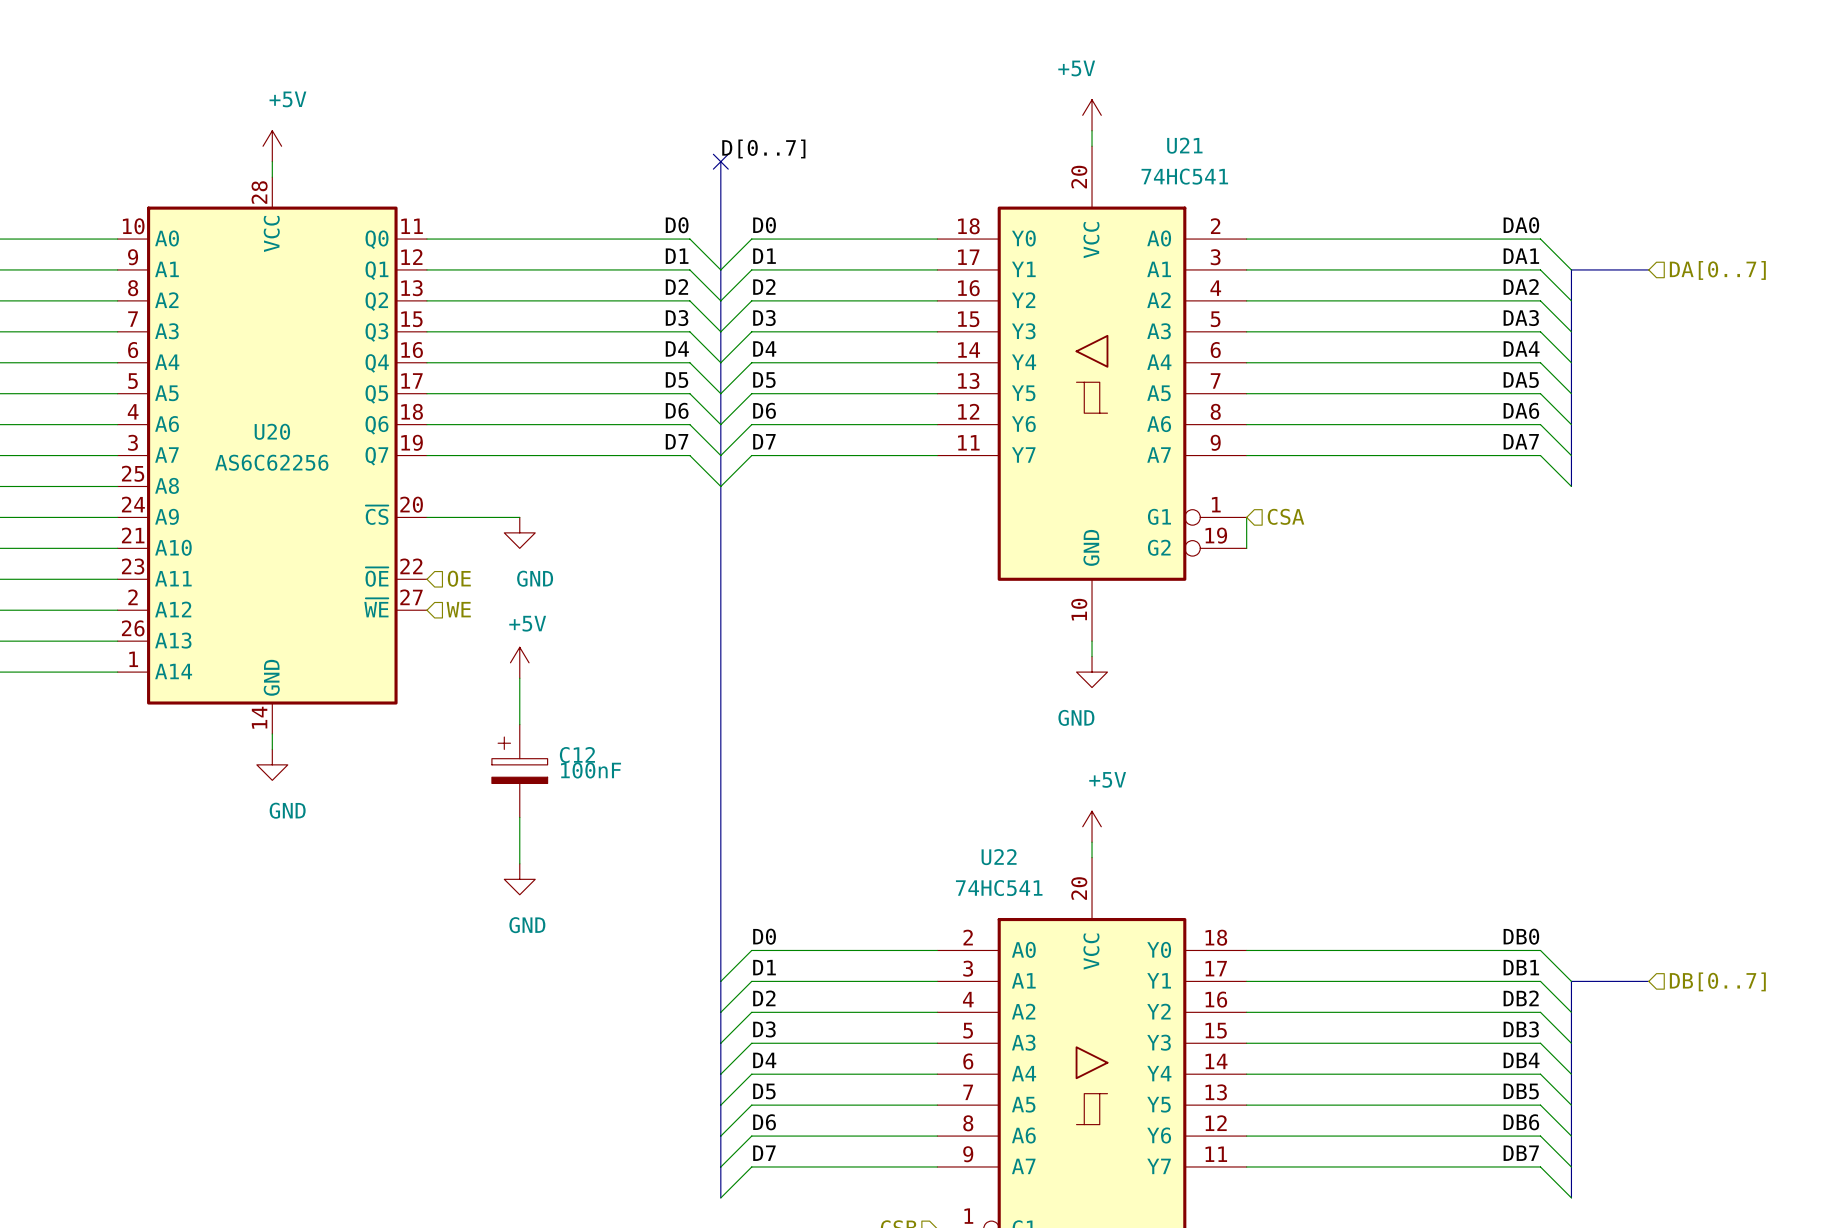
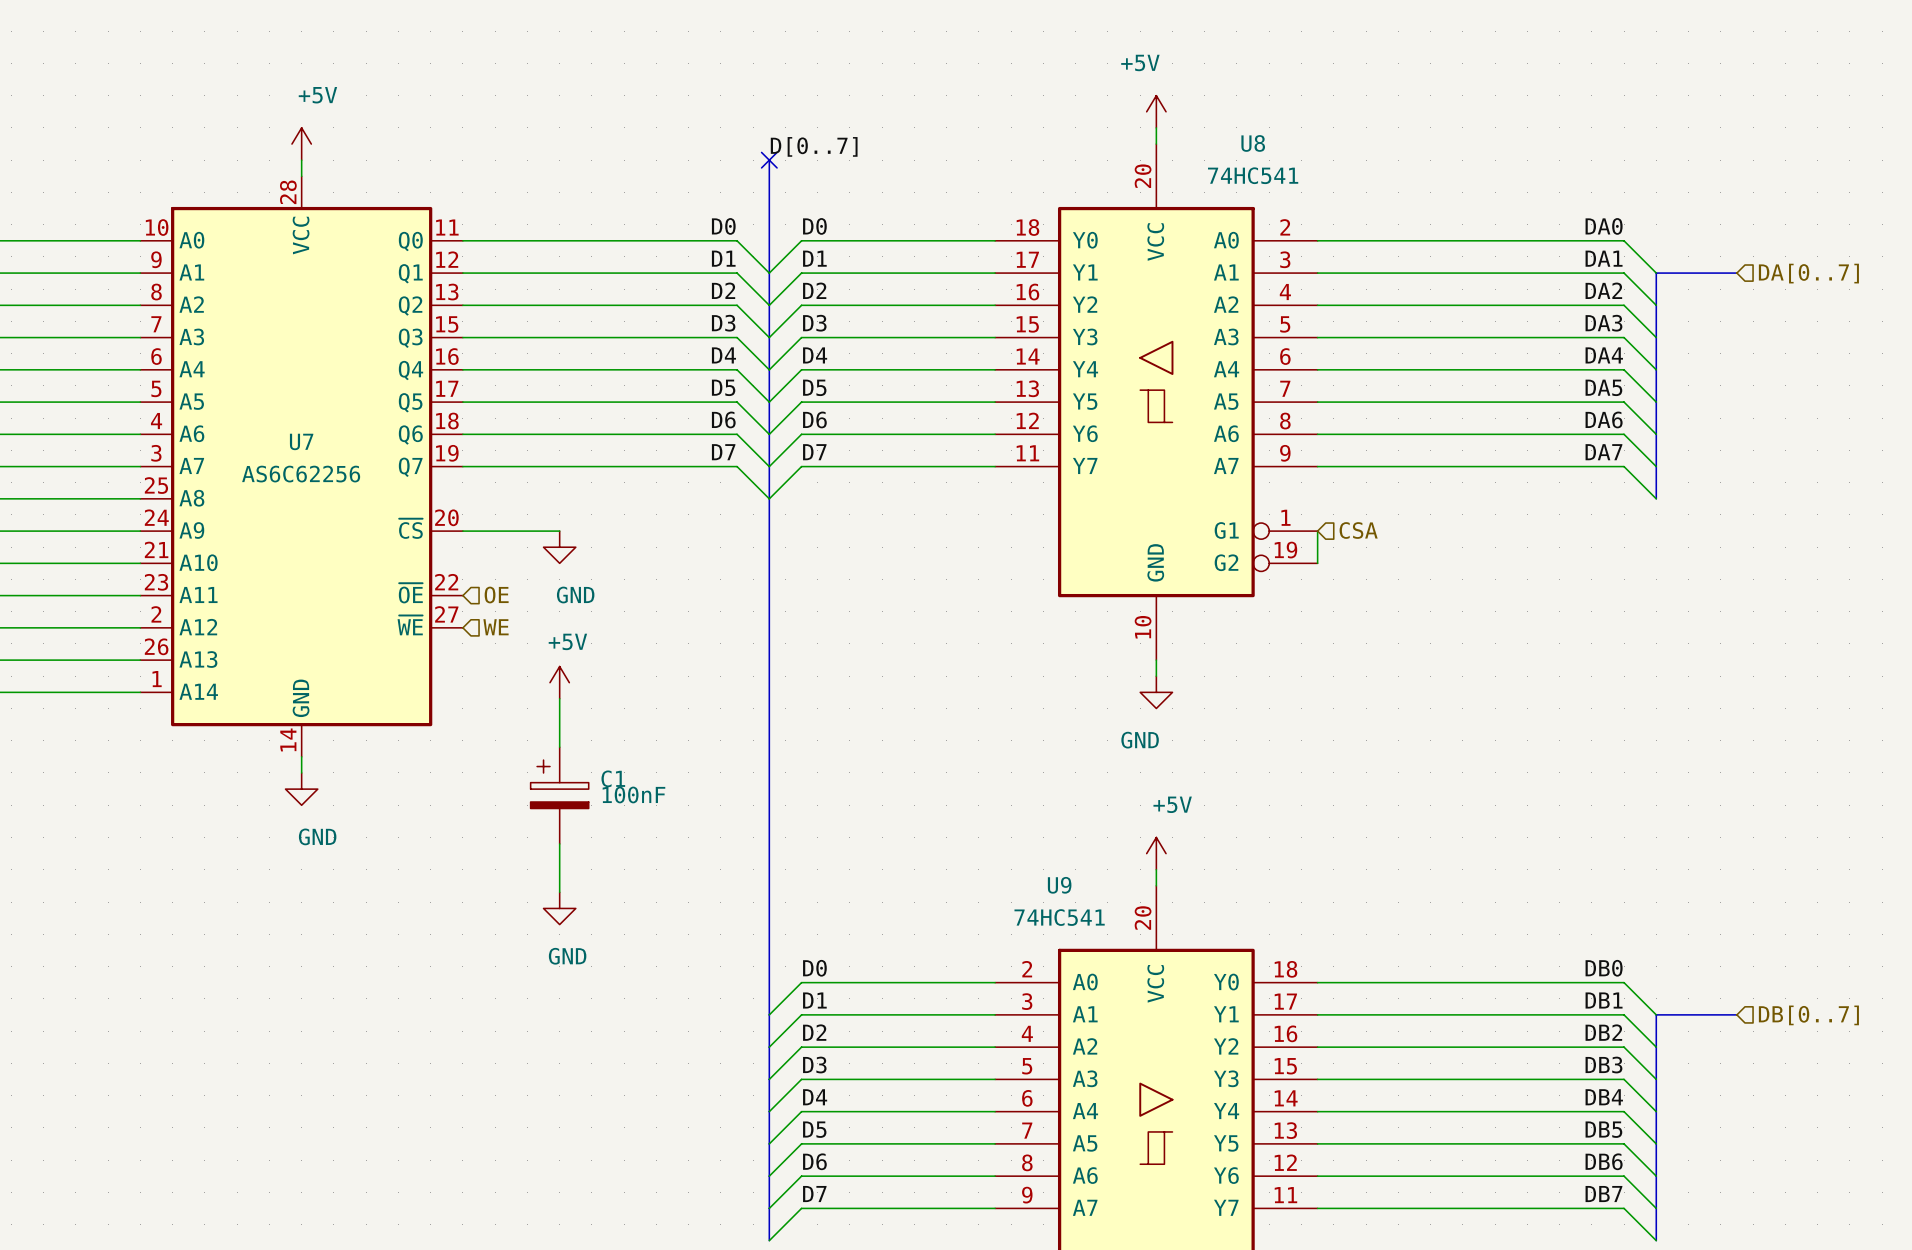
U21 name: U21 (1184, 145) -> U8 (1253, 143)
U20 name: U20 (272, 431) -> U7 (301, 441)
C12 name: C12 (577, 755) -> C1 (613, 778)
U22 name: U22 (999, 857) -> U9 (1059, 885)

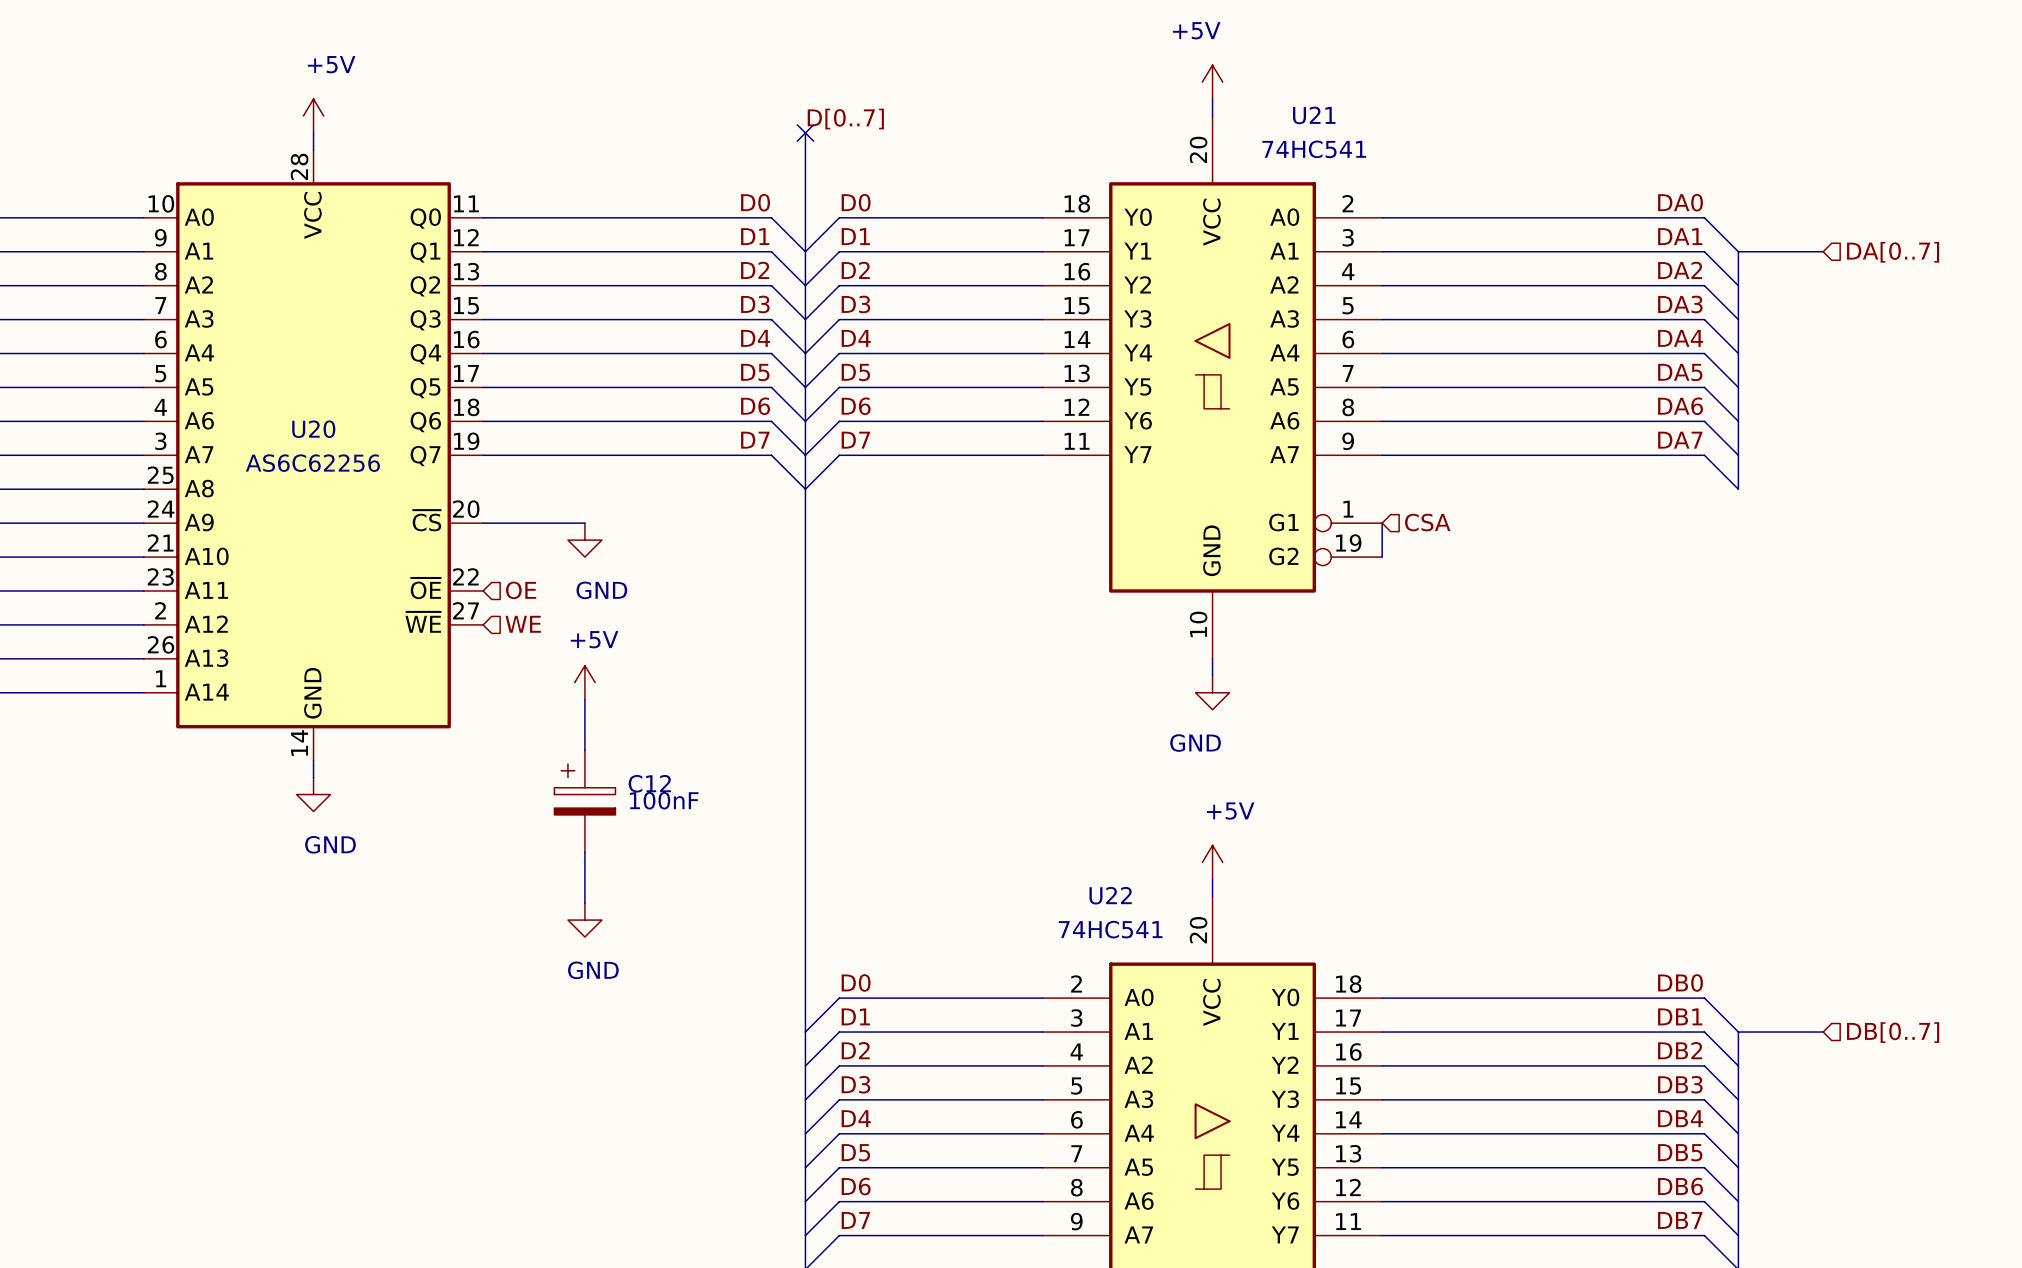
U8 name: U8 (1253, 143) -> U21 (1314, 115)
U7 name: U7 (301, 441) -> U20 (313, 429)
C1 name: C1 (613, 778) -> C12 (649, 783)
U9 name: U9 (1059, 885) -> U22 (1110, 895)

